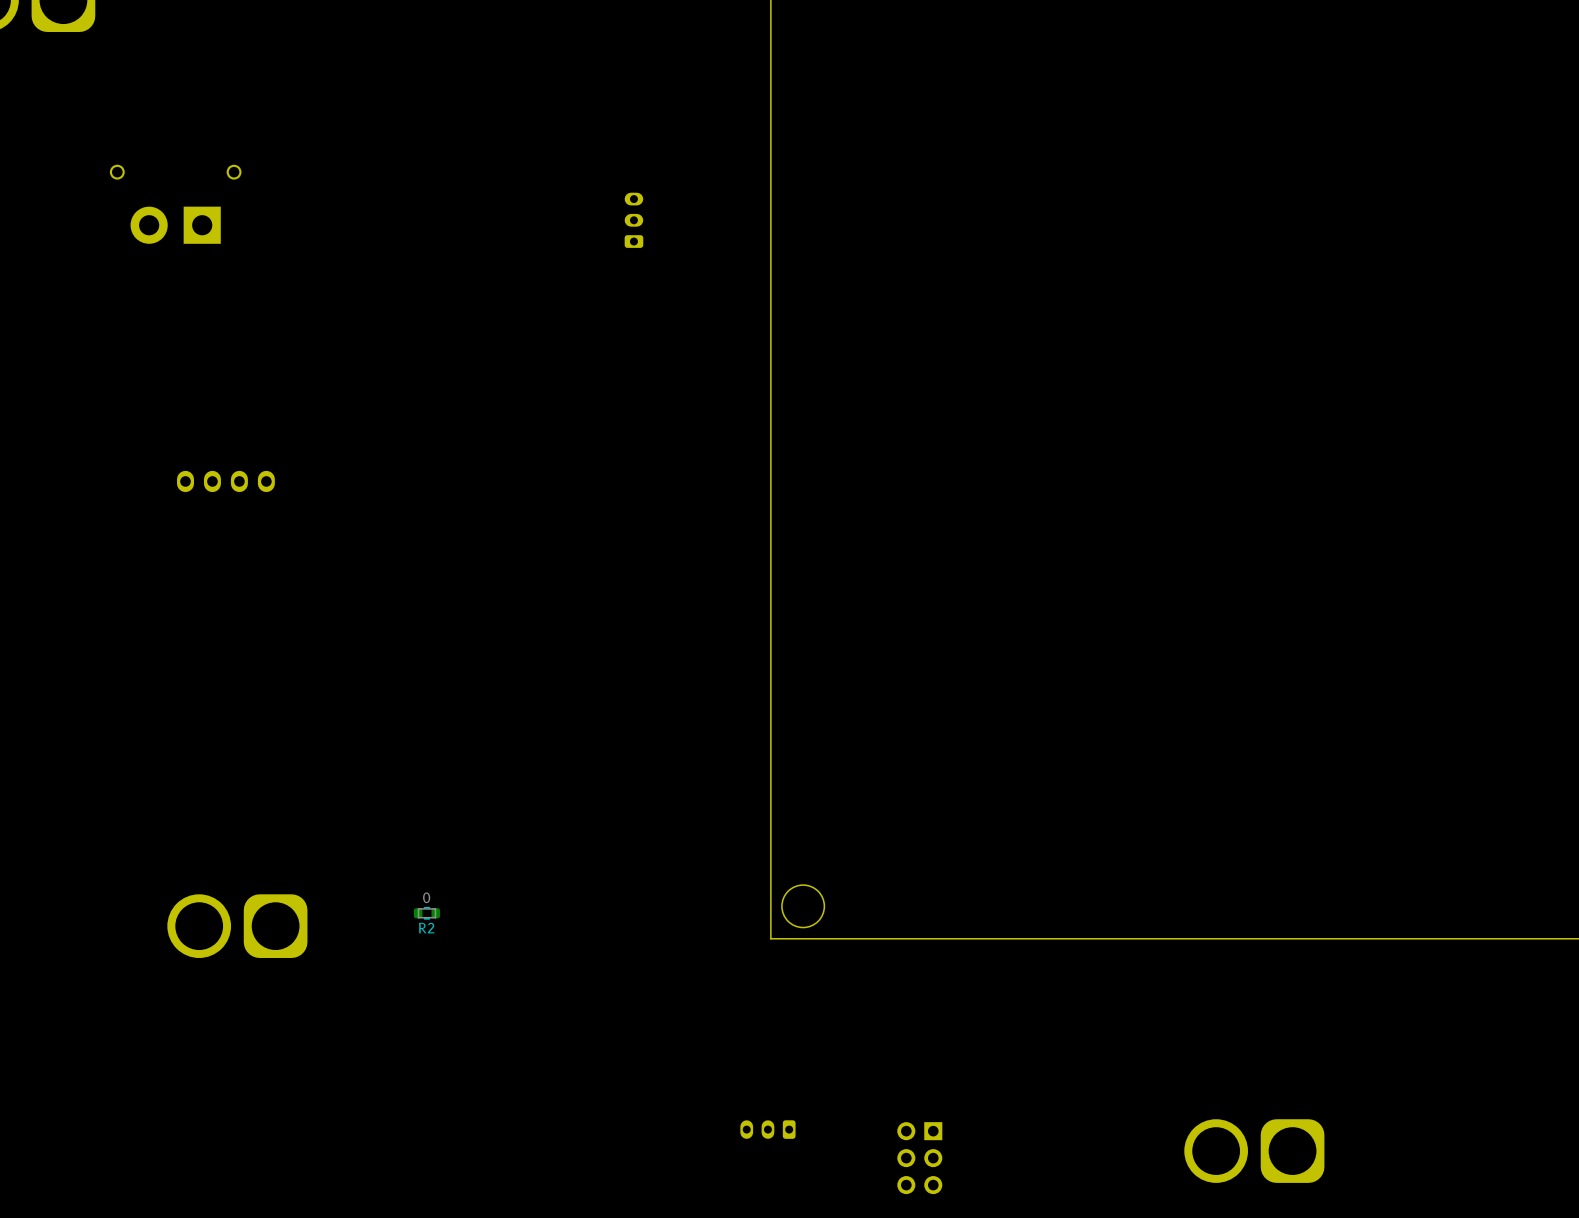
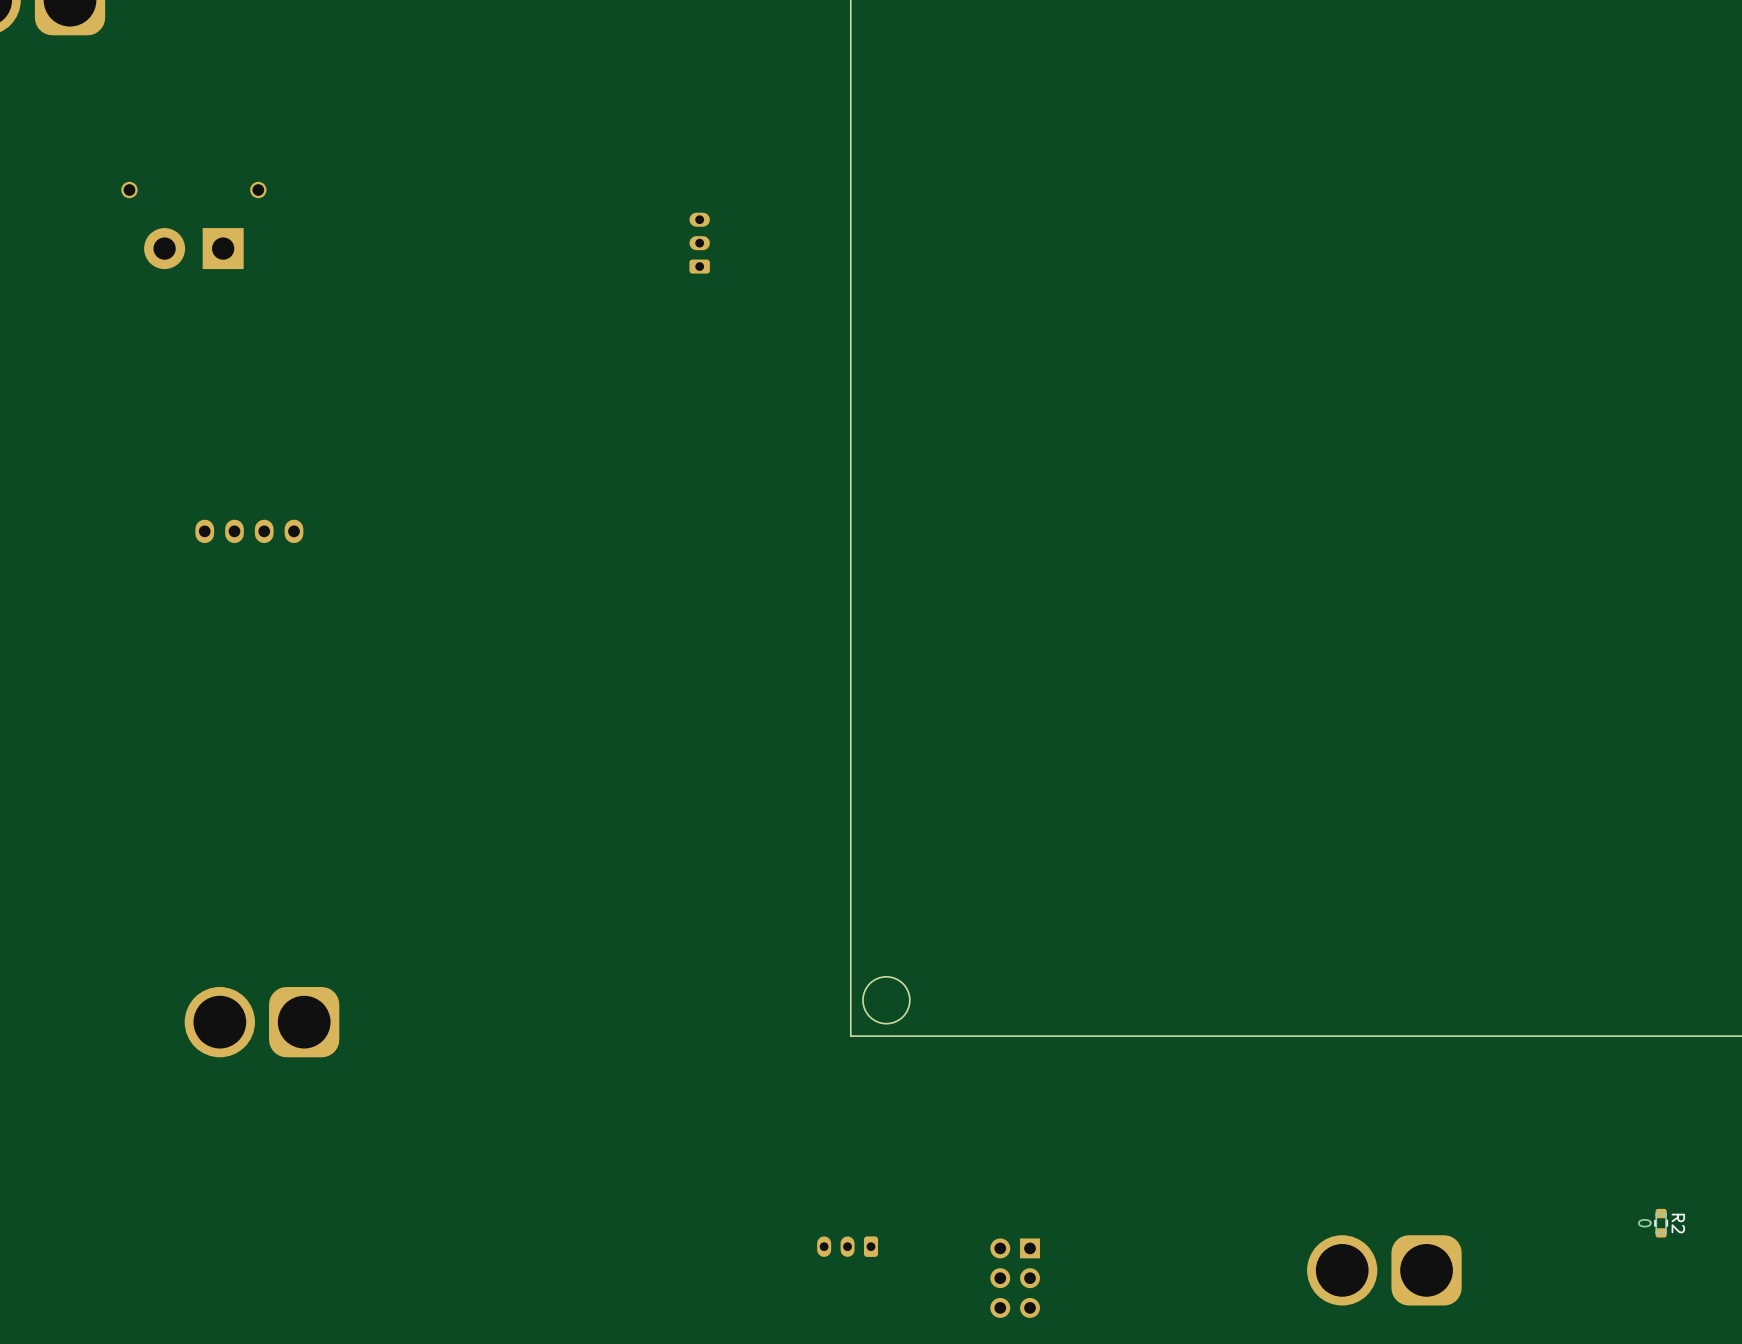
R2 value position: 0 (426, 897) -> 0 (1644, 1223)
R2 rotation: 0° (426, 913) -> 90° clockwise (1661, 1223)
R2 position: (426, 913) -> (1661, 1223)
R2 name position: R2 (426, 928) -> R2 (1678, 1223)

